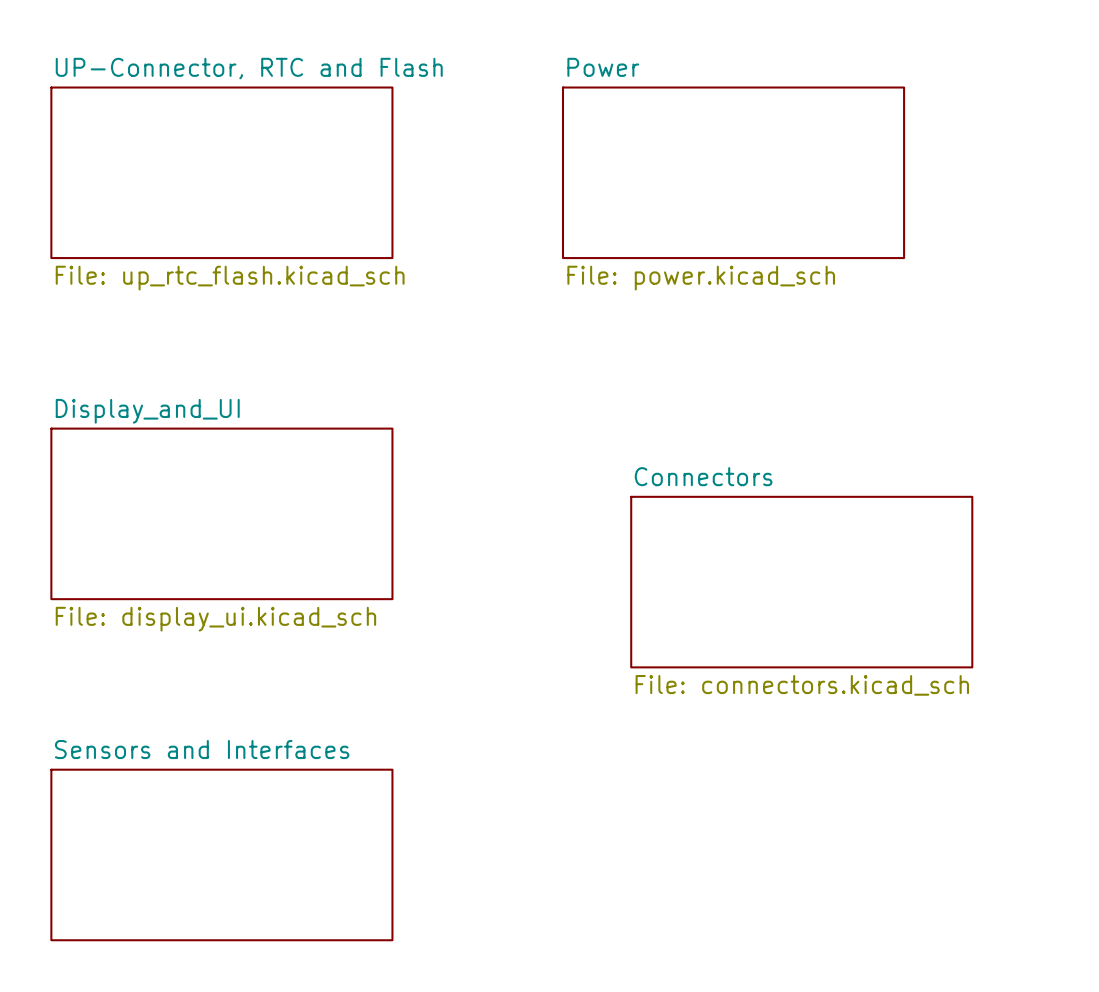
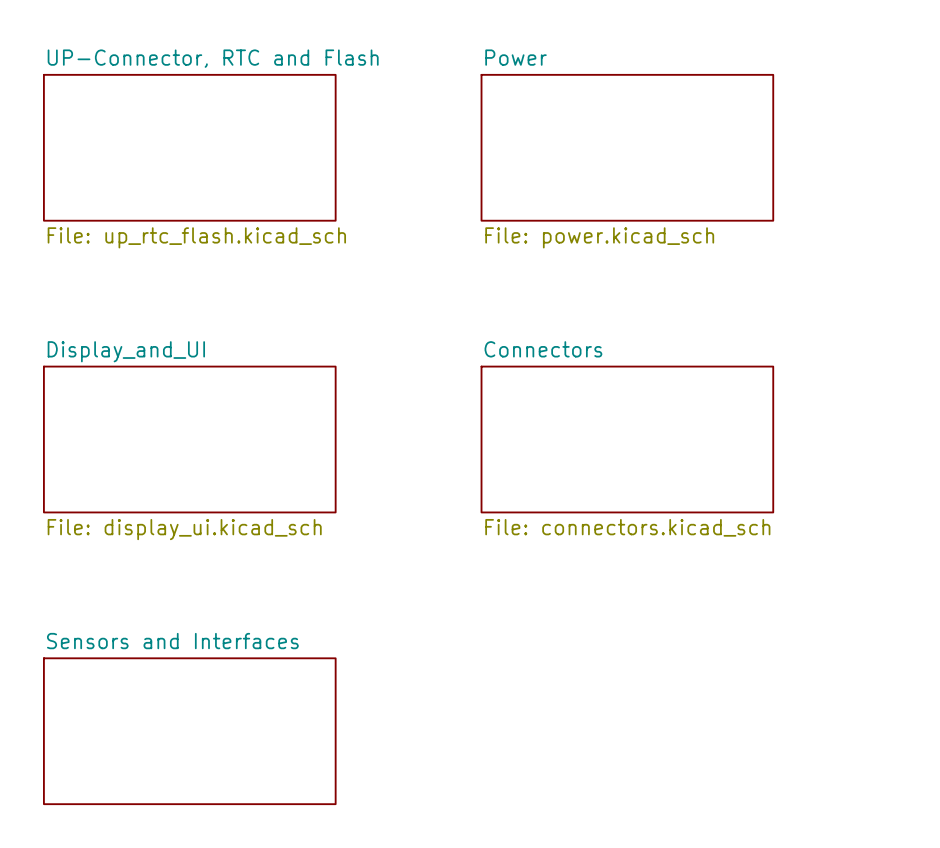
sheet Connectors position: (801, 582) -> (627, 439)

